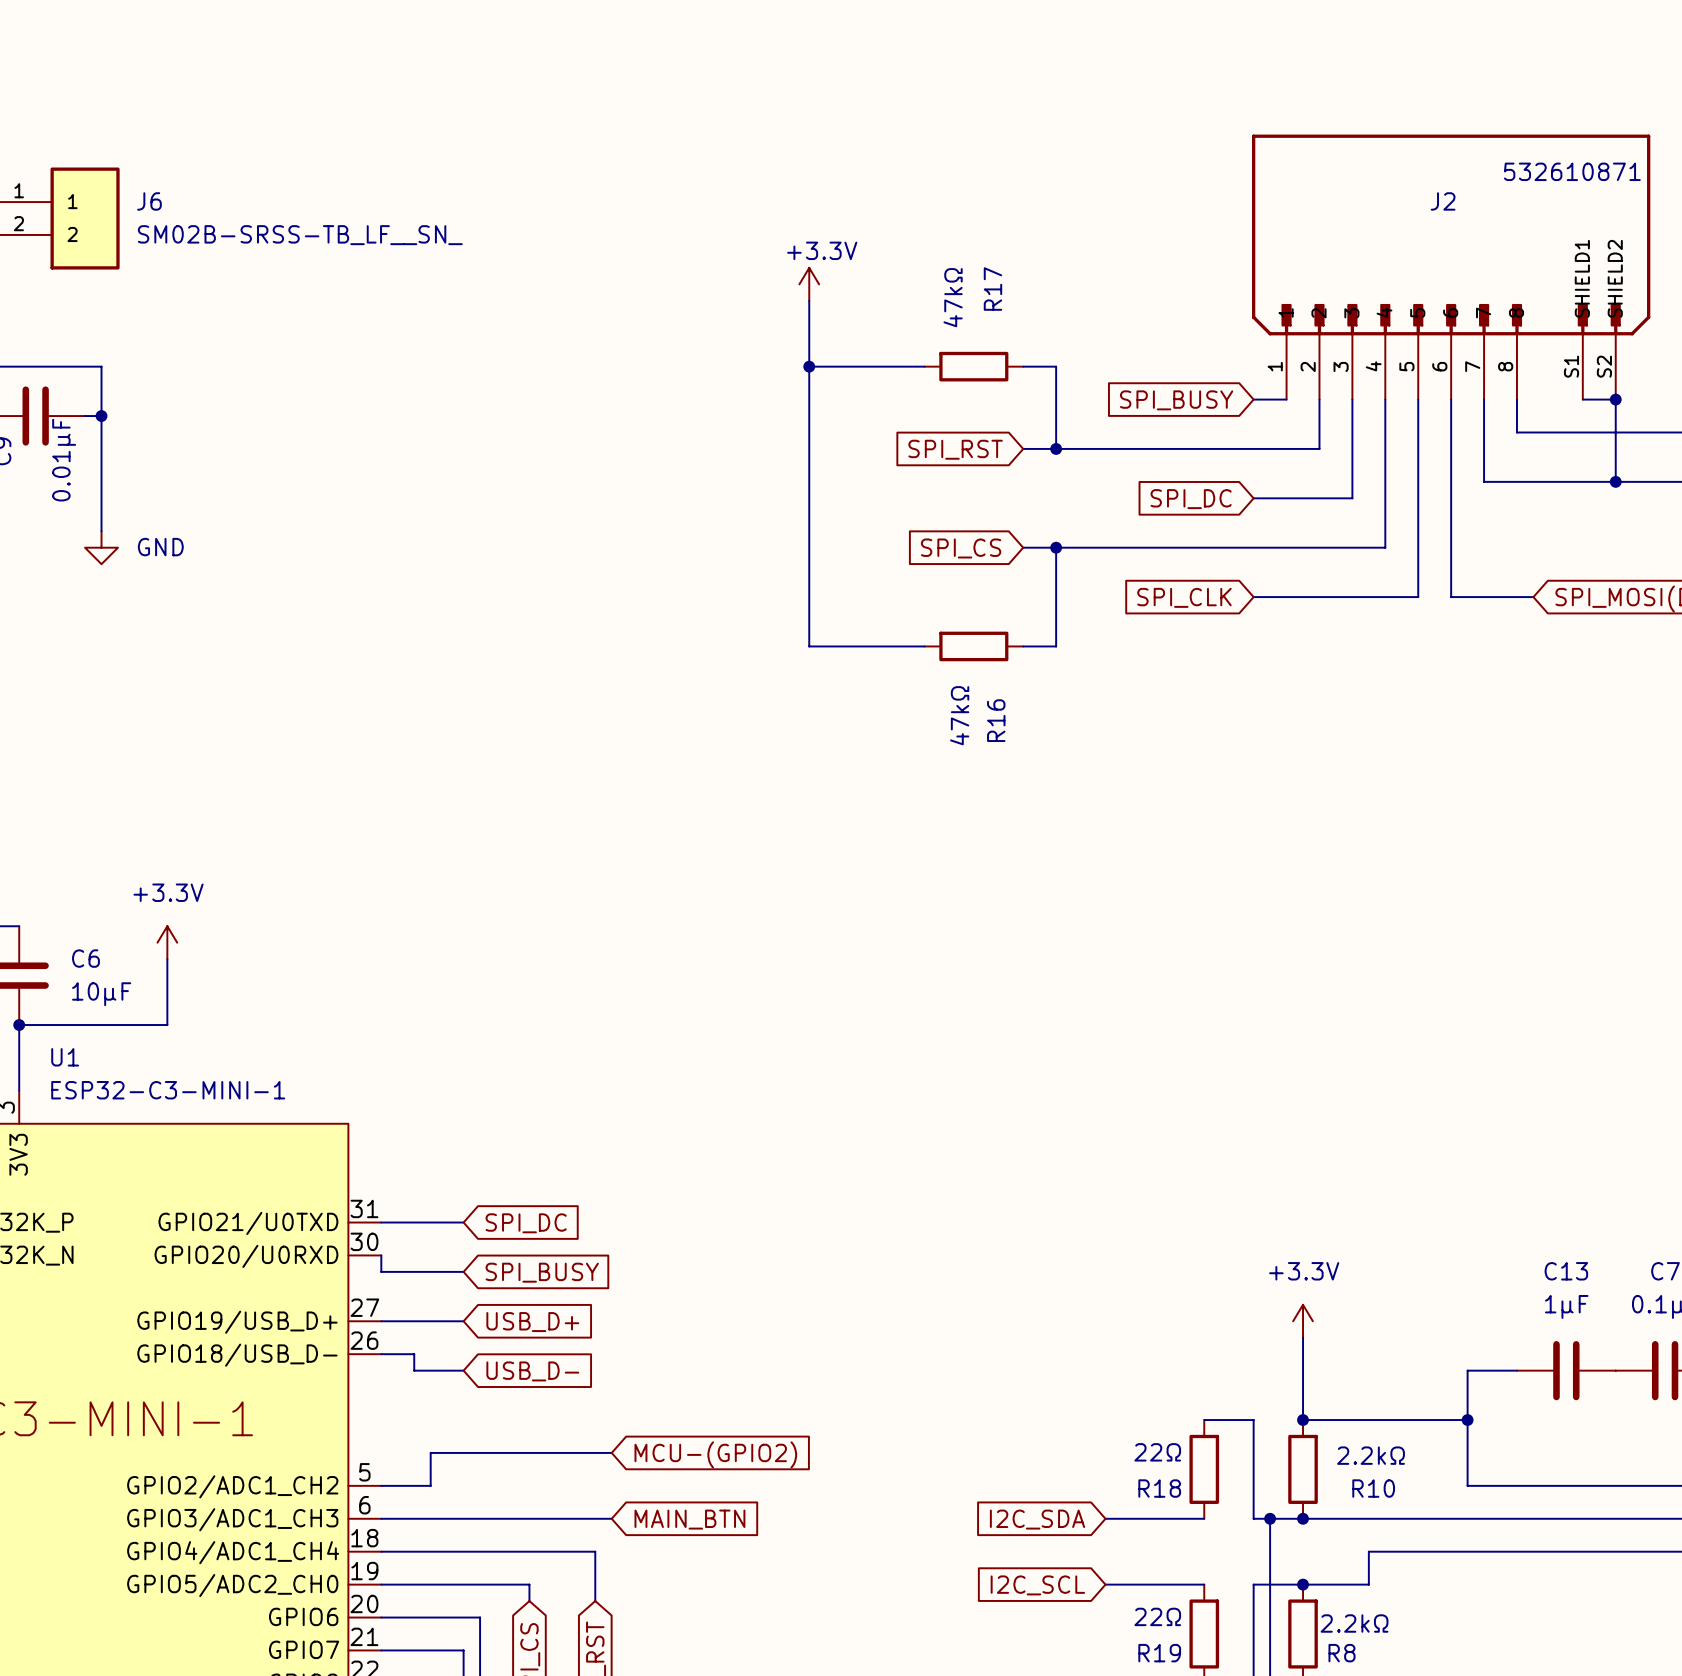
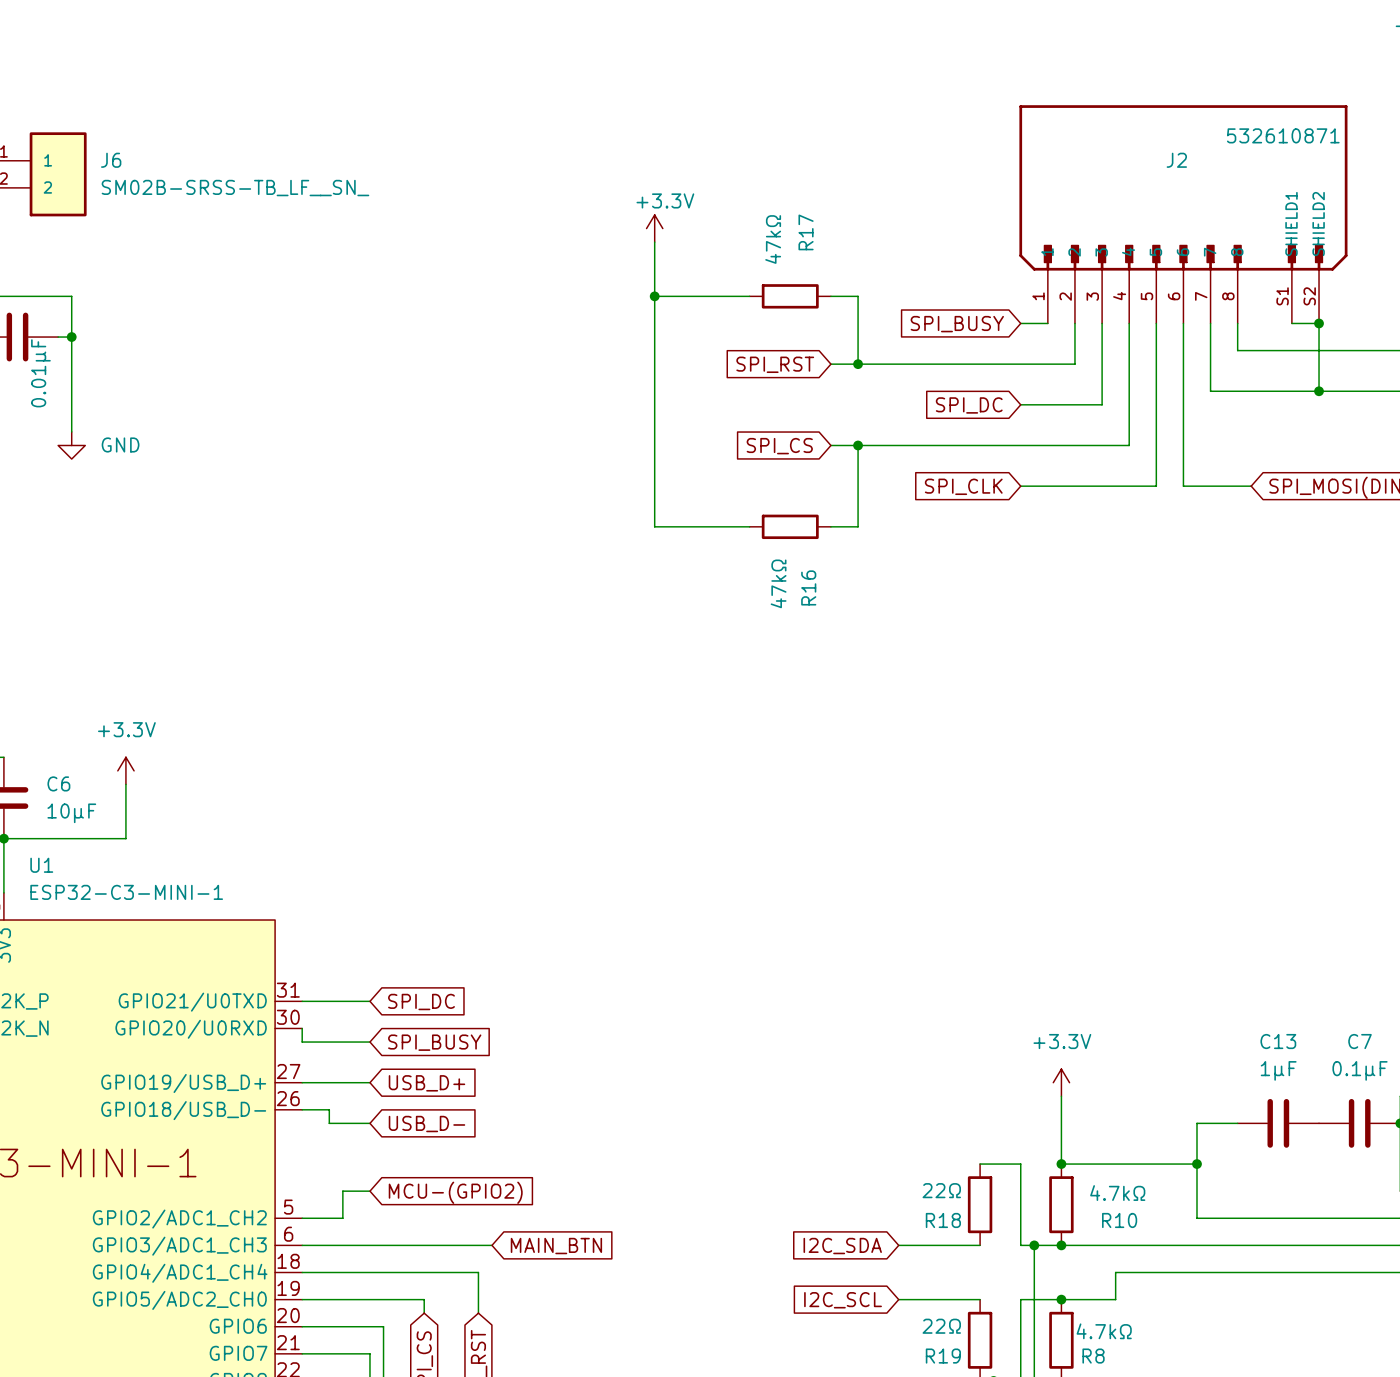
wire: (463, 1452) (611, 1452) -> none
global label position: MCU-(GPIO2) (715, 1454) -> MCU-(GPIO2) (455, 1192)
R10 value: 2.2kΩ (1371, 1455) -> 4.7kΩ (1117, 1193)
R8 value: 2.2kΩ (1354, 1623) -> 4.7kΩ (1104, 1331)

